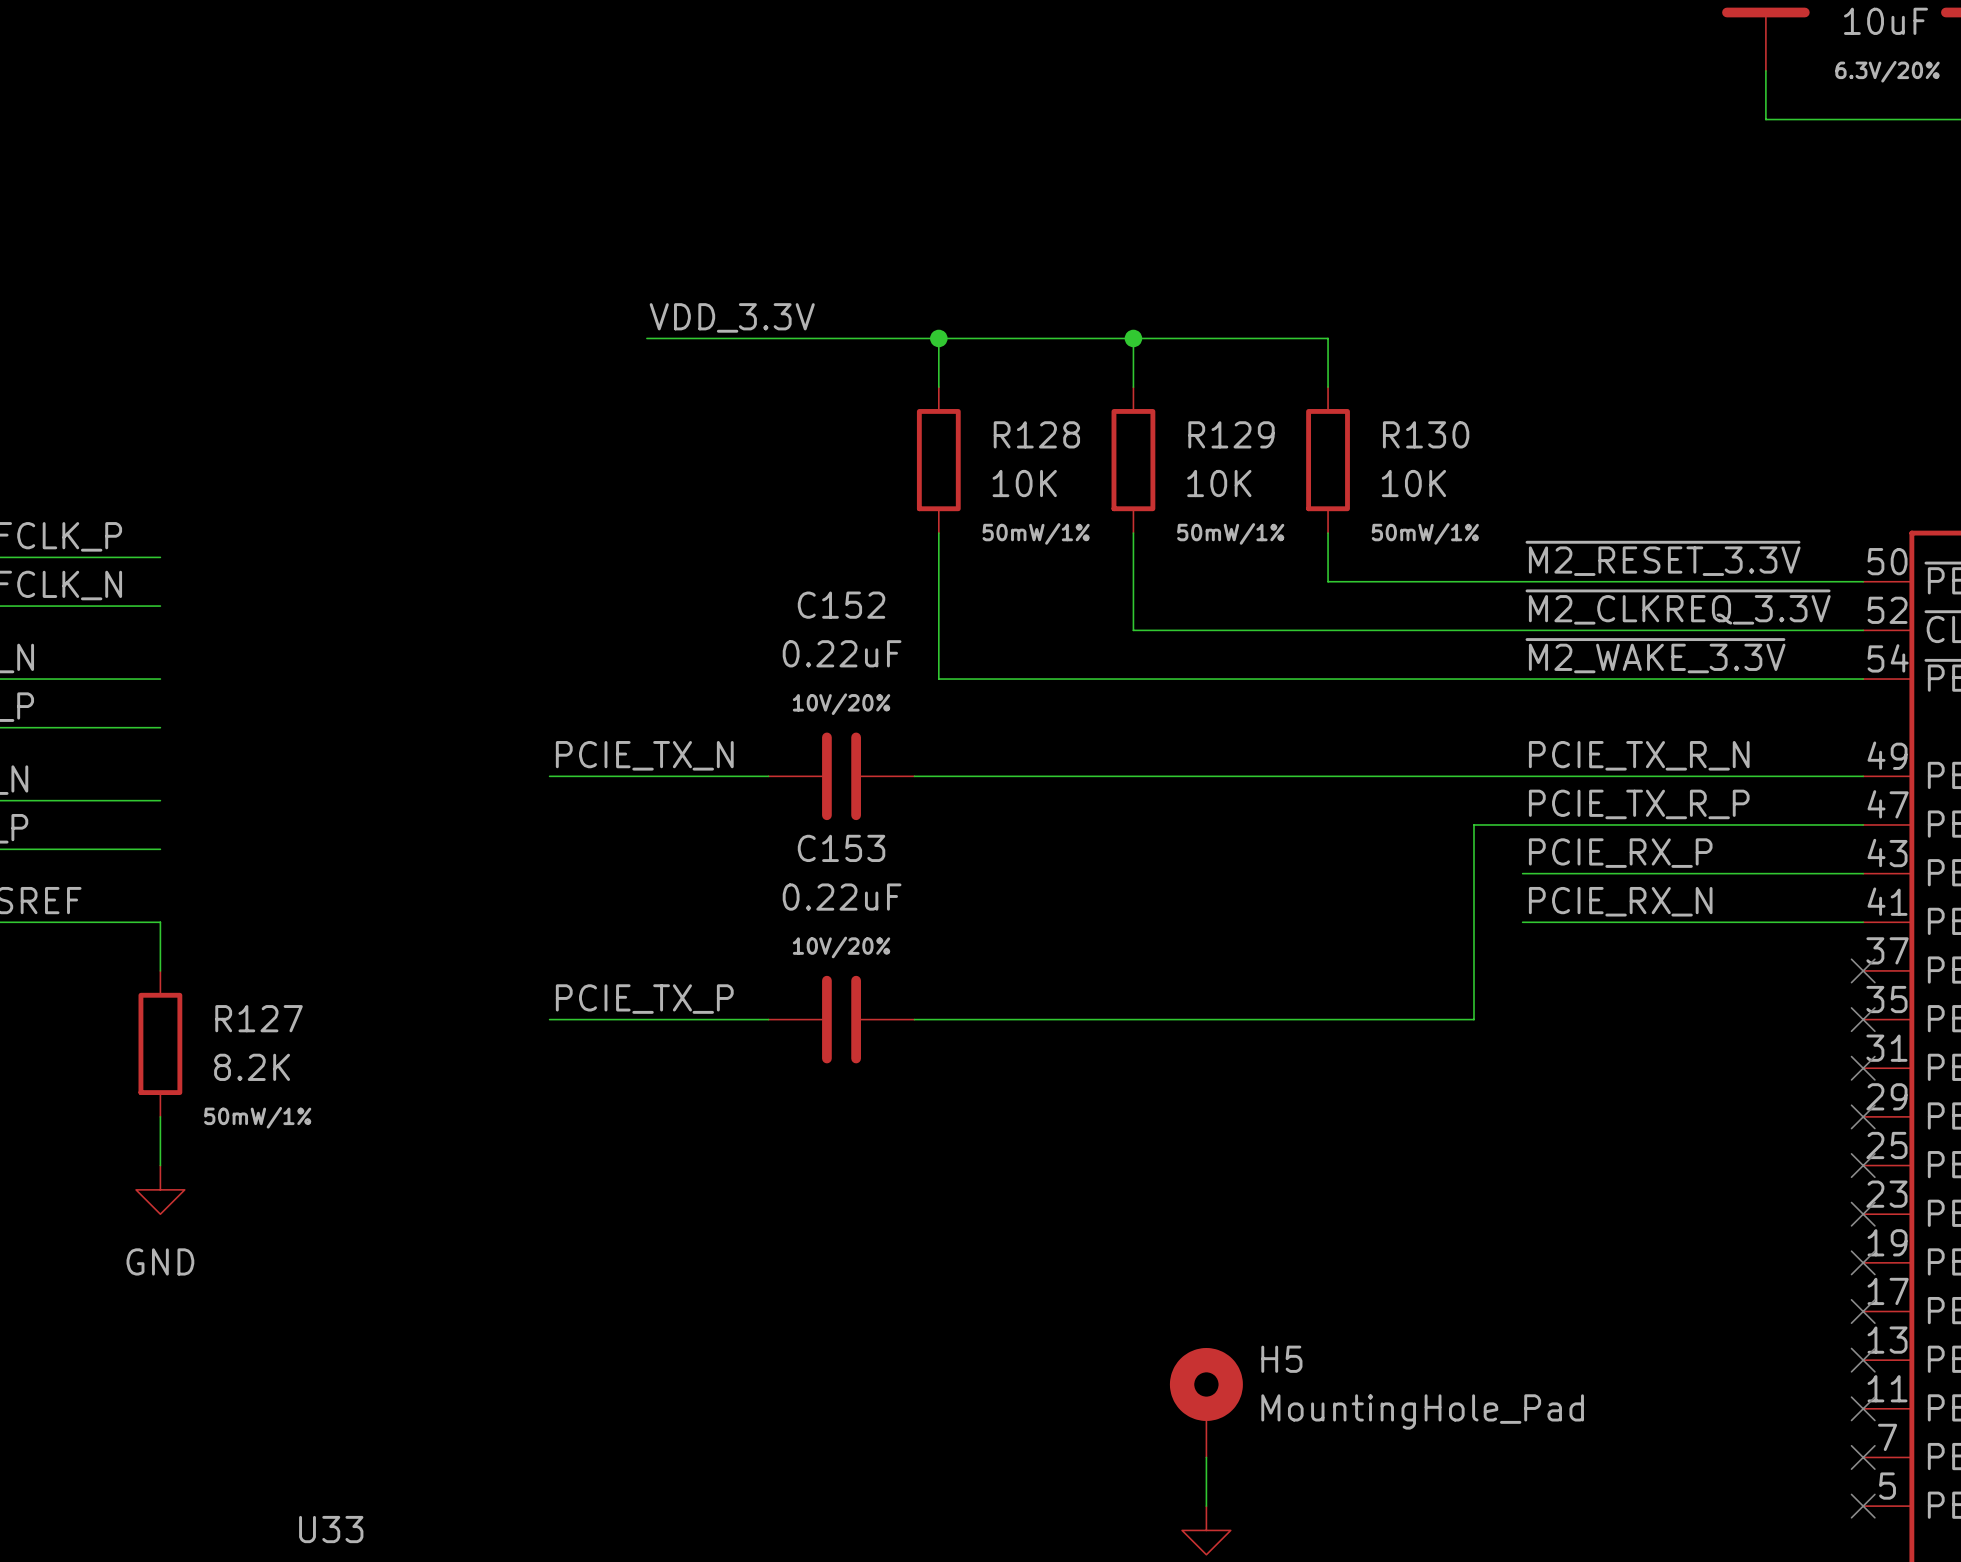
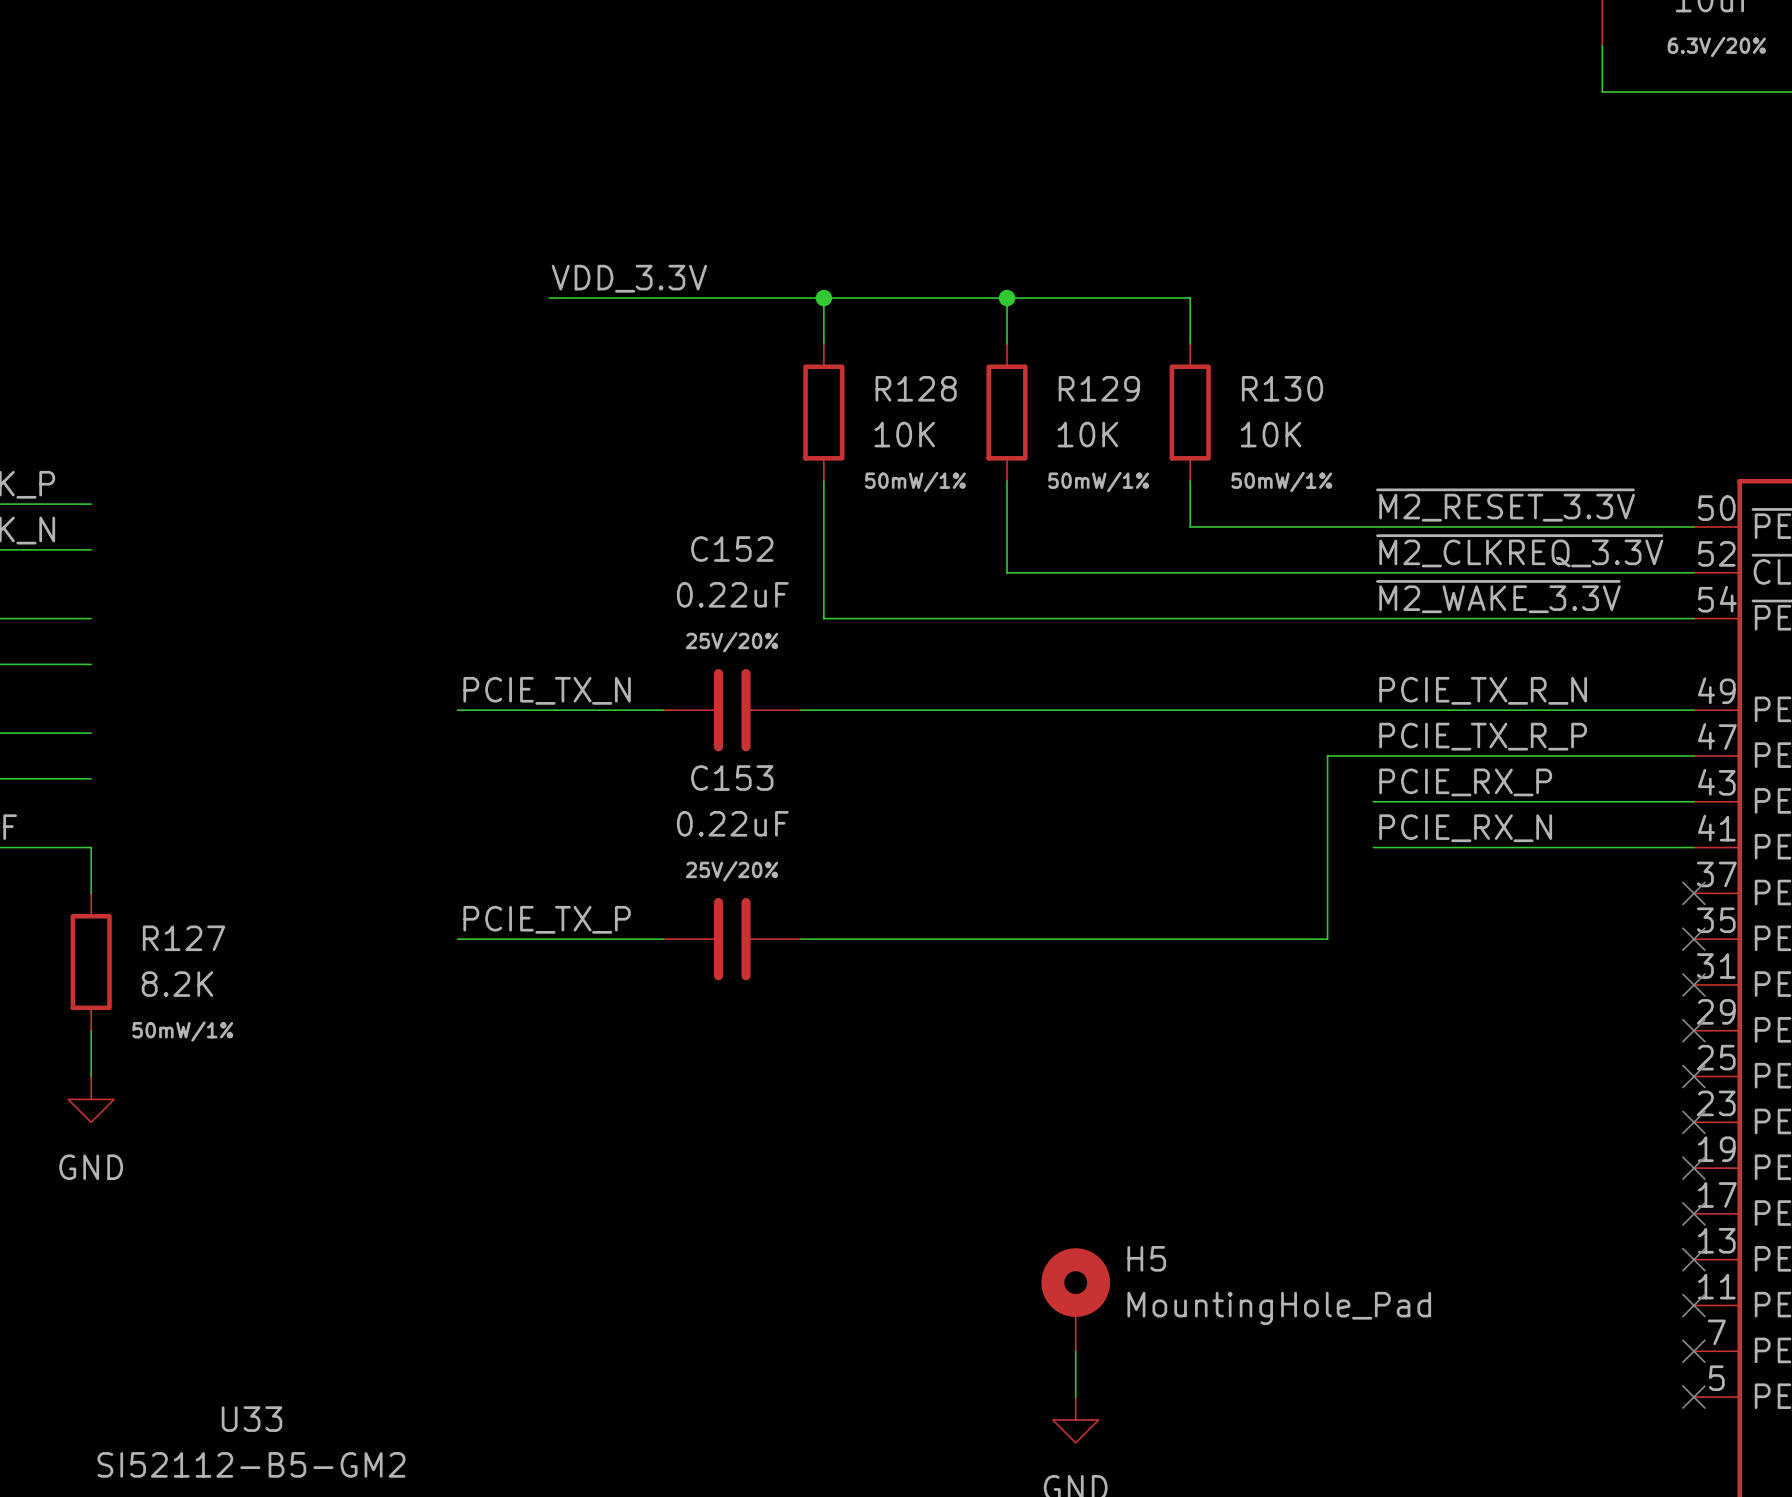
C152 text: 10V/20% (841, 704) -> 25V/20% (731, 642)
C153 text: 10V/20% (841, 947) -> 25V/20% (731, 871)

